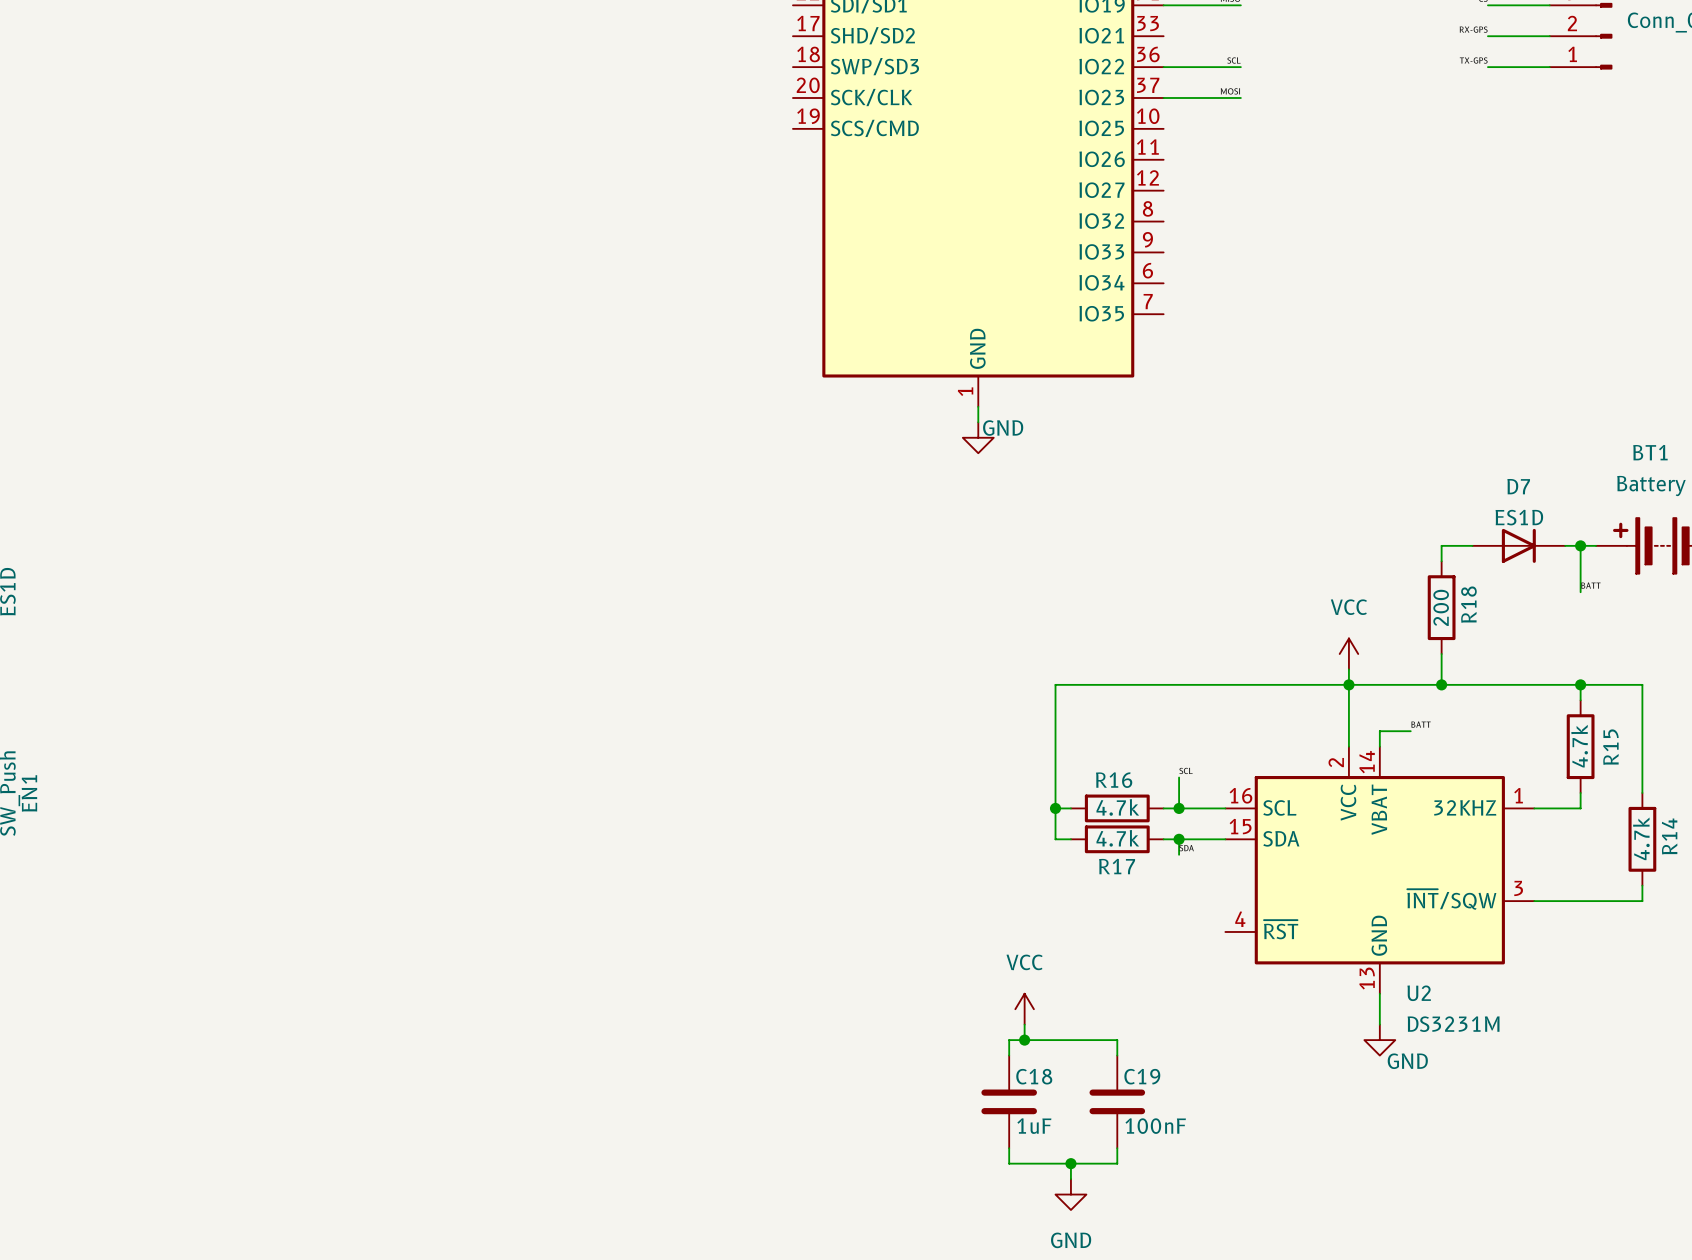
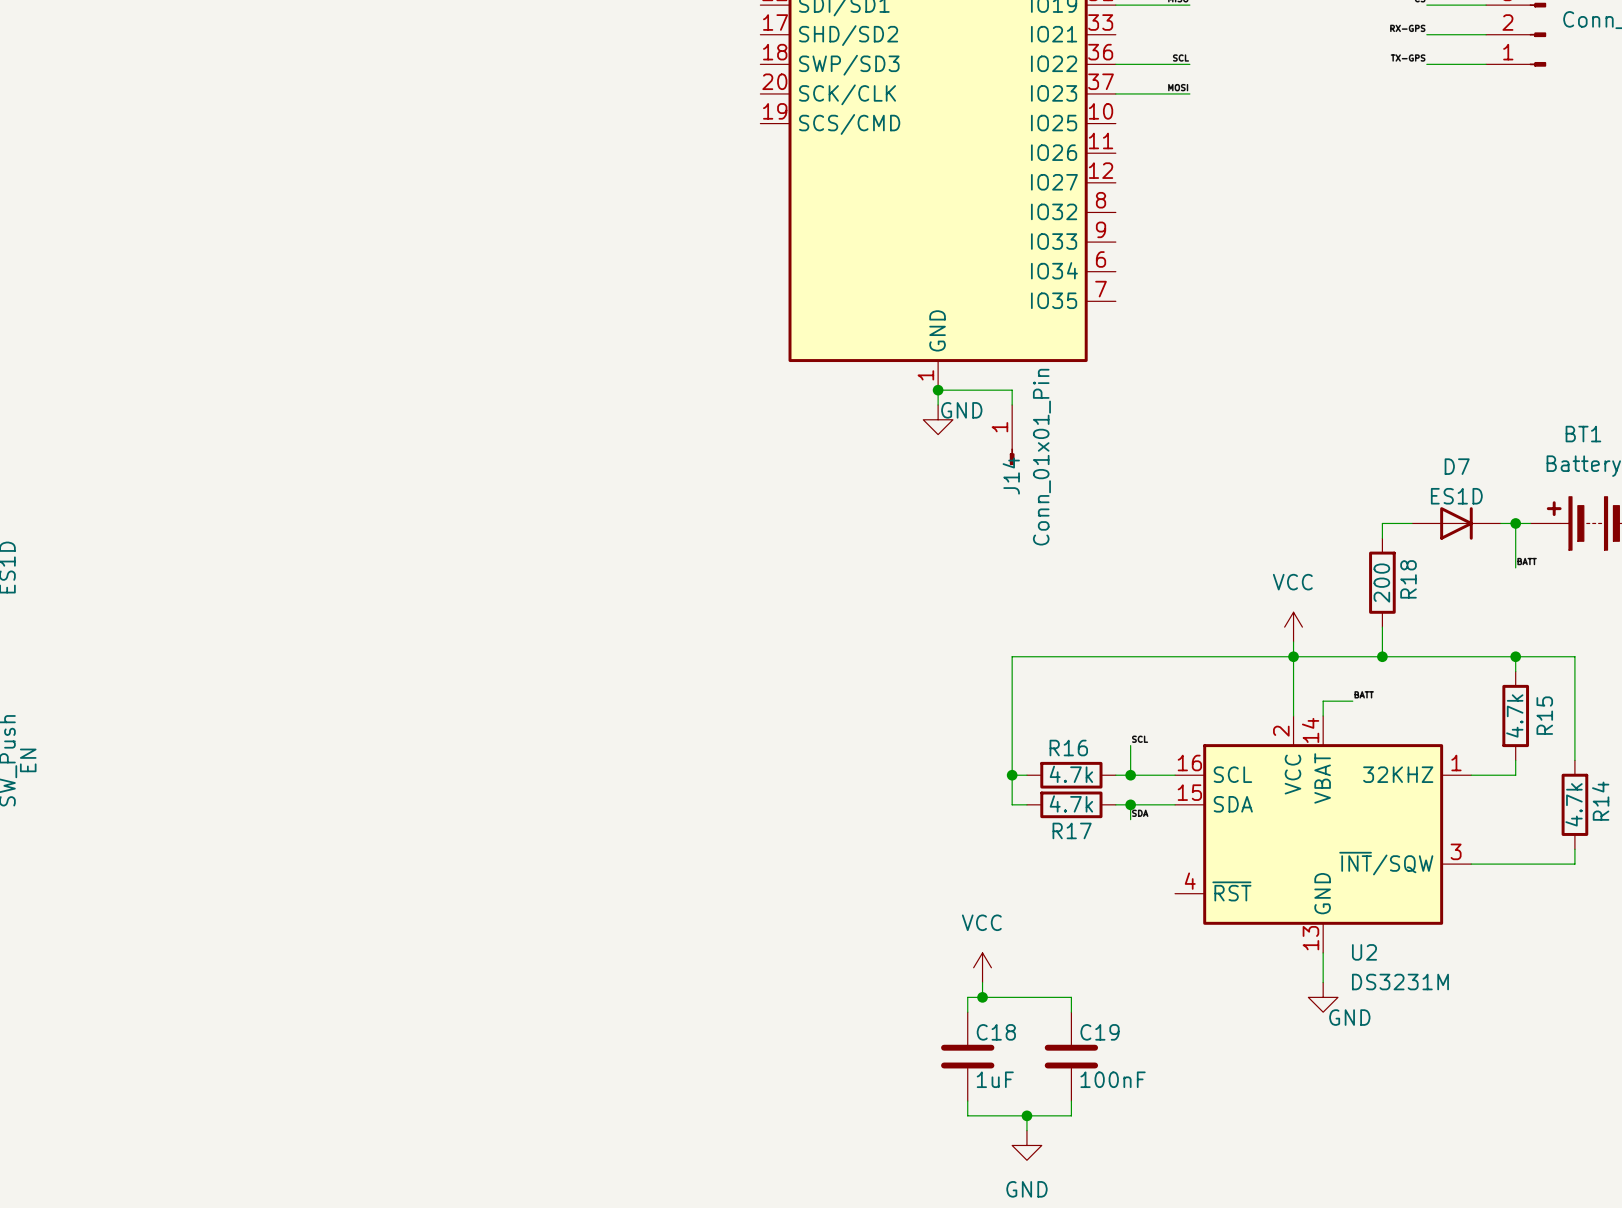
wire: none -> (938, 390) (1012, 390) (1012, 404)
junction: none -> (938, 390)
J14: none -> Conn_01x01_Pin (1012, 435)
EN1 name: EN1 (29, 793) -> EN (28, 760)

